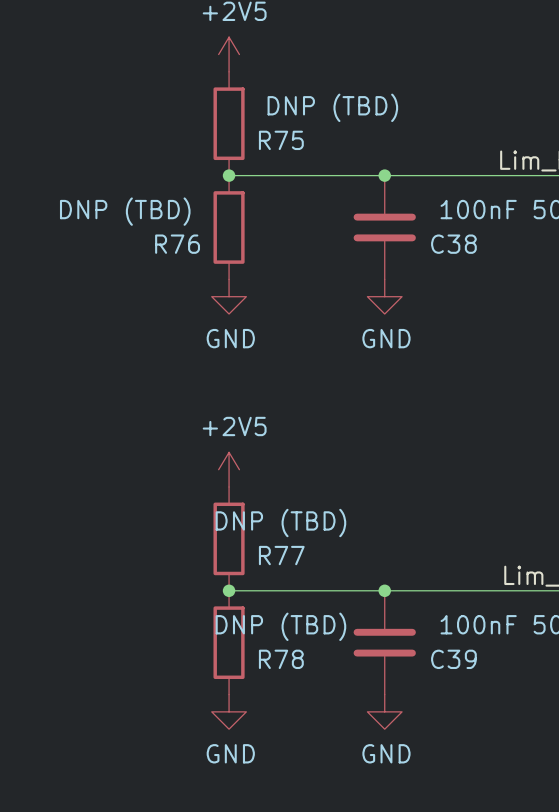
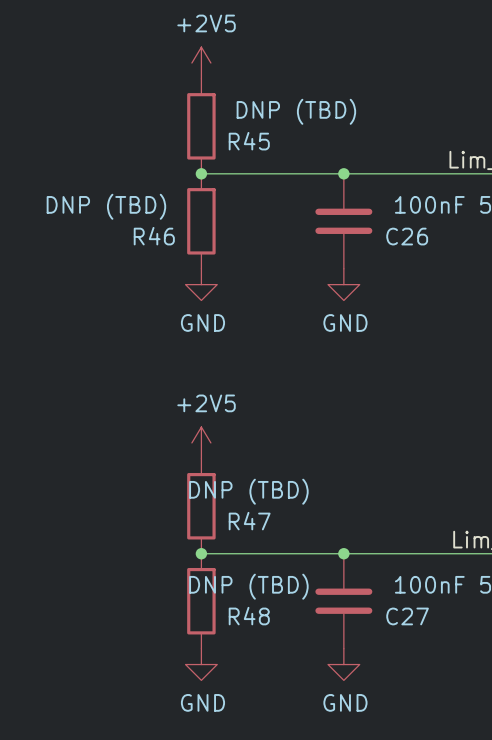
R75 name: R75 (281, 140) -> R45 (249, 141)
R76 name: R76 (177, 244) -> R46 (154, 236)
C38 name: C38 (453, 244) -> C26 (407, 236)
R77 name: R77 (281, 555) -> R47 (249, 521)
R78 name: R78 (281, 659) -> R48 (249, 616)
C39 name: C39 (453, 659) -> C27 (407, 616)

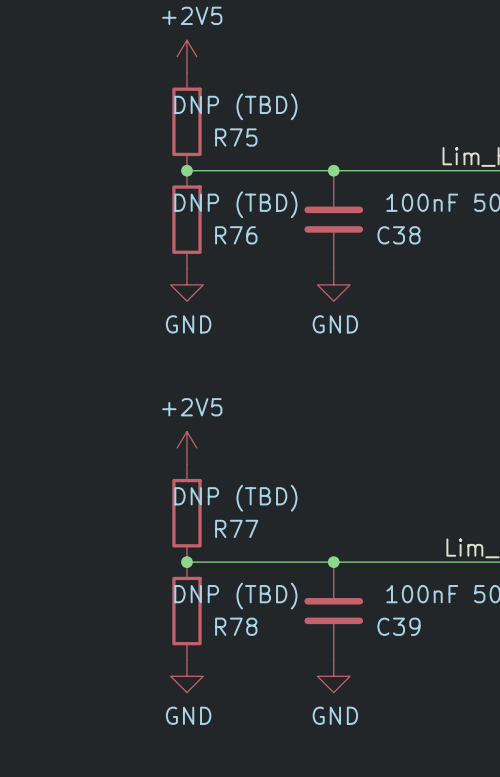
R45 value position: DNP (TBD) (296, 111) -> DNP (TBD) (235, 106)
R45 name: R45 (249, 141) -> R75 (236, 137)
R46 value position: DNP (TBD) (106, 206) -> DNP (TBD) (235, 204)
R46 name: R46 (154, 236) -> R76 (236, 235)
C26 name: C26 (407, 236) -> C38 (398, 235)
R47 name: R47 (249, 521) -> R77 (236, 528)
R48 name: R48 (249, 616) -> R78 (236, 626)
C27 name: C27 (407, 616) -> C39 (398, 626)

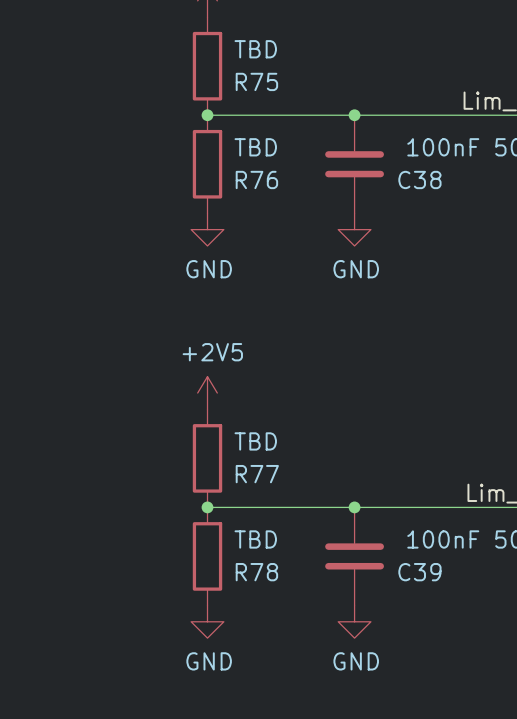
R75 value: DNP (TBD) (235, 106) -> TBD (255, 49)
R76 value: DNP (TBD) (235, 204) -> TBD (255, 147)
R77 value: DNP (TBD) (235, 498) -> TBD (255, 441)
R78 value: DNP (TBD) (235, 596) -> TBD (255, 539)

